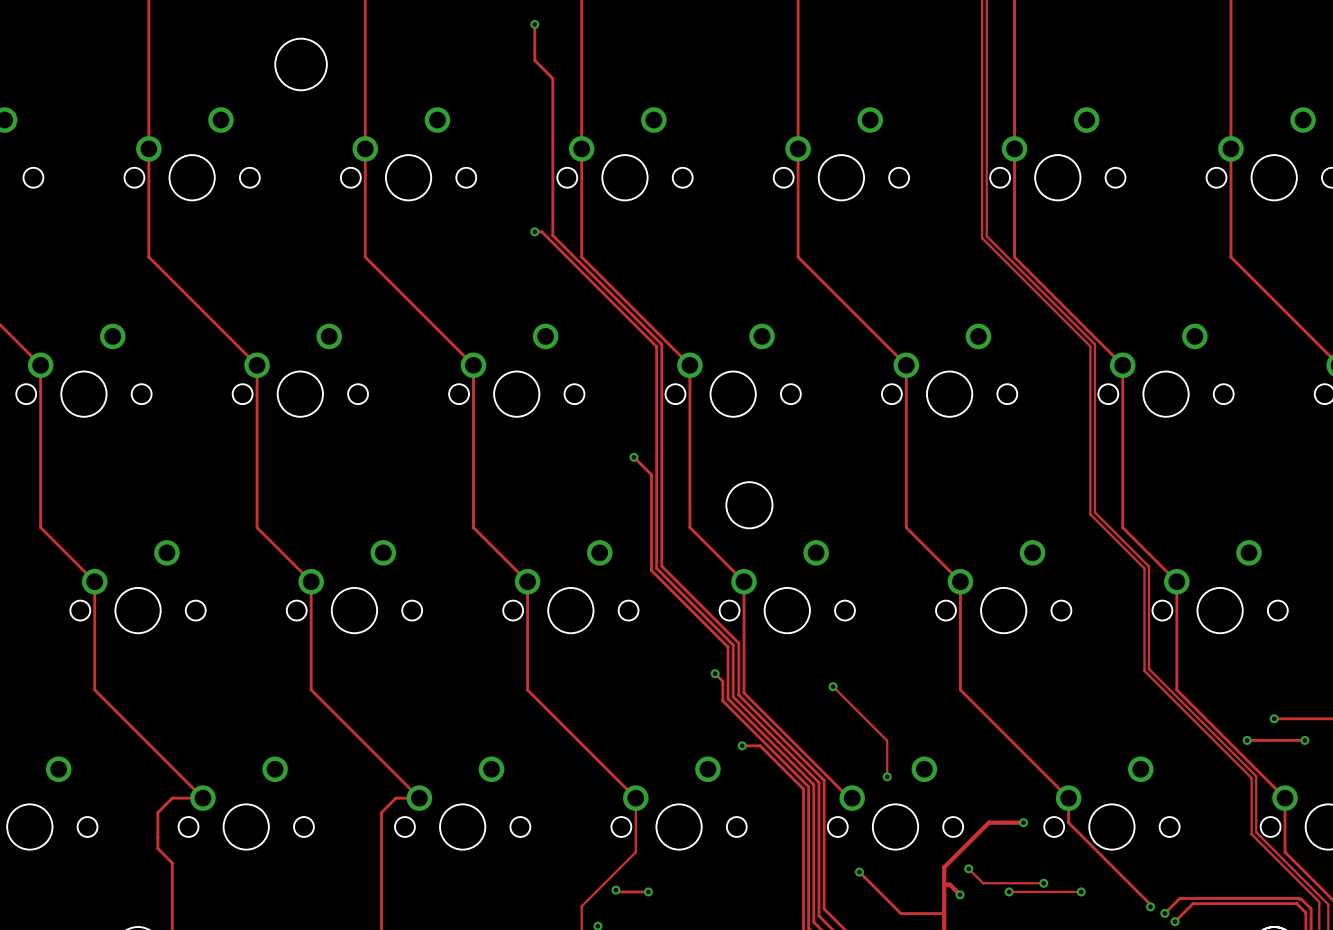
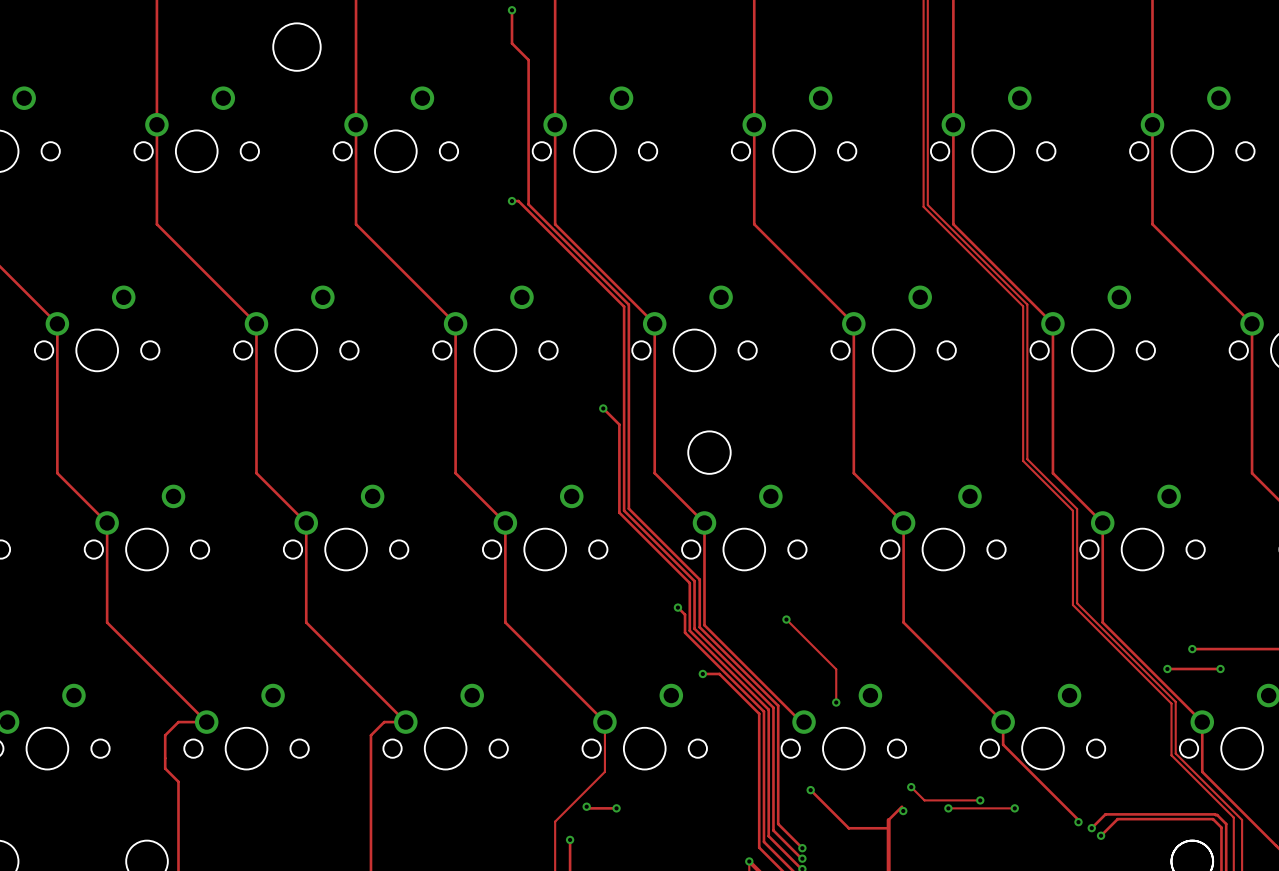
track: (1023, 822) (988, 822) (944, 867) (944, 904) -> (901, 806) (888, 819)
via: (1023, 822) -> none
track: (944, 884) (949, 884) (960, 894) -> none

